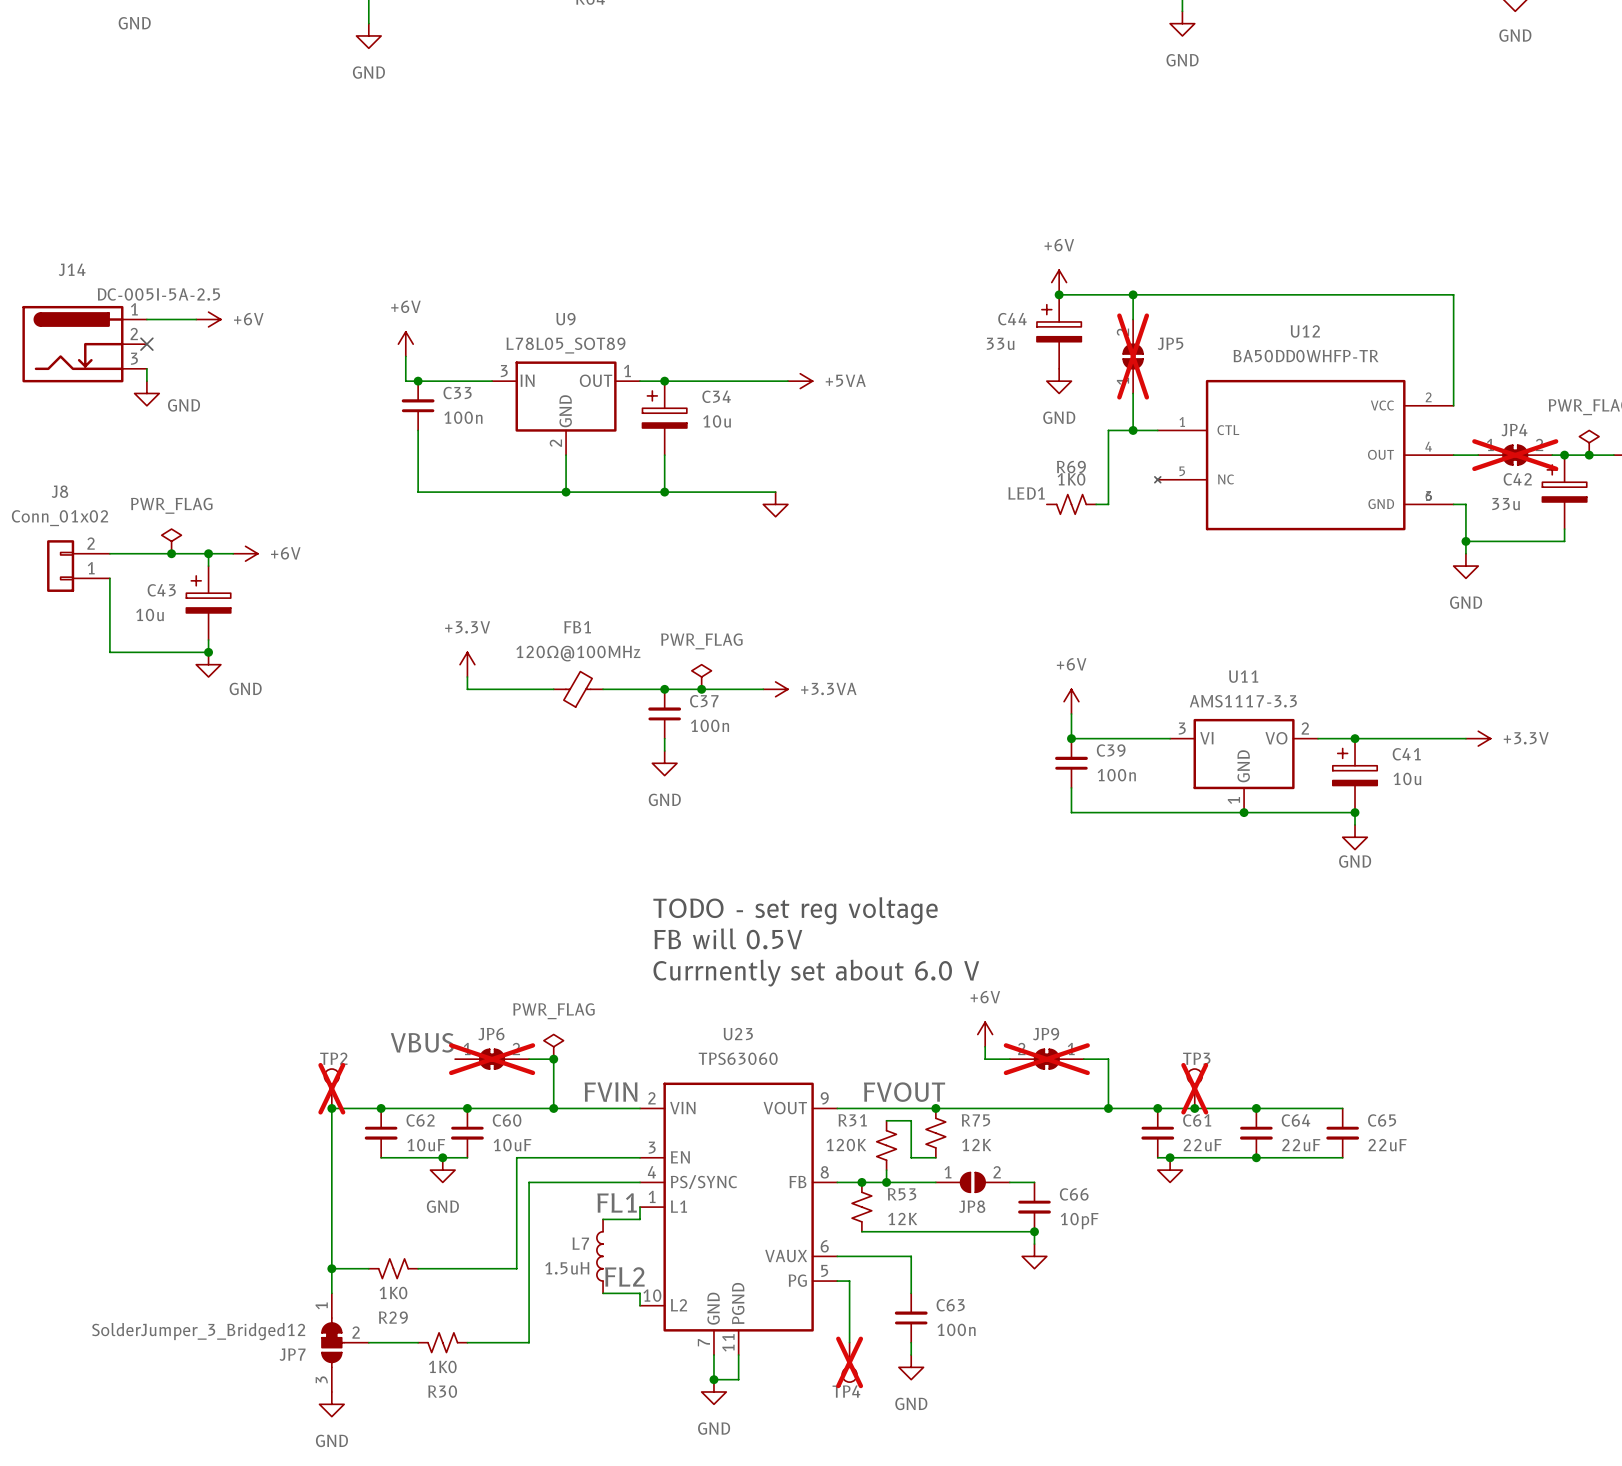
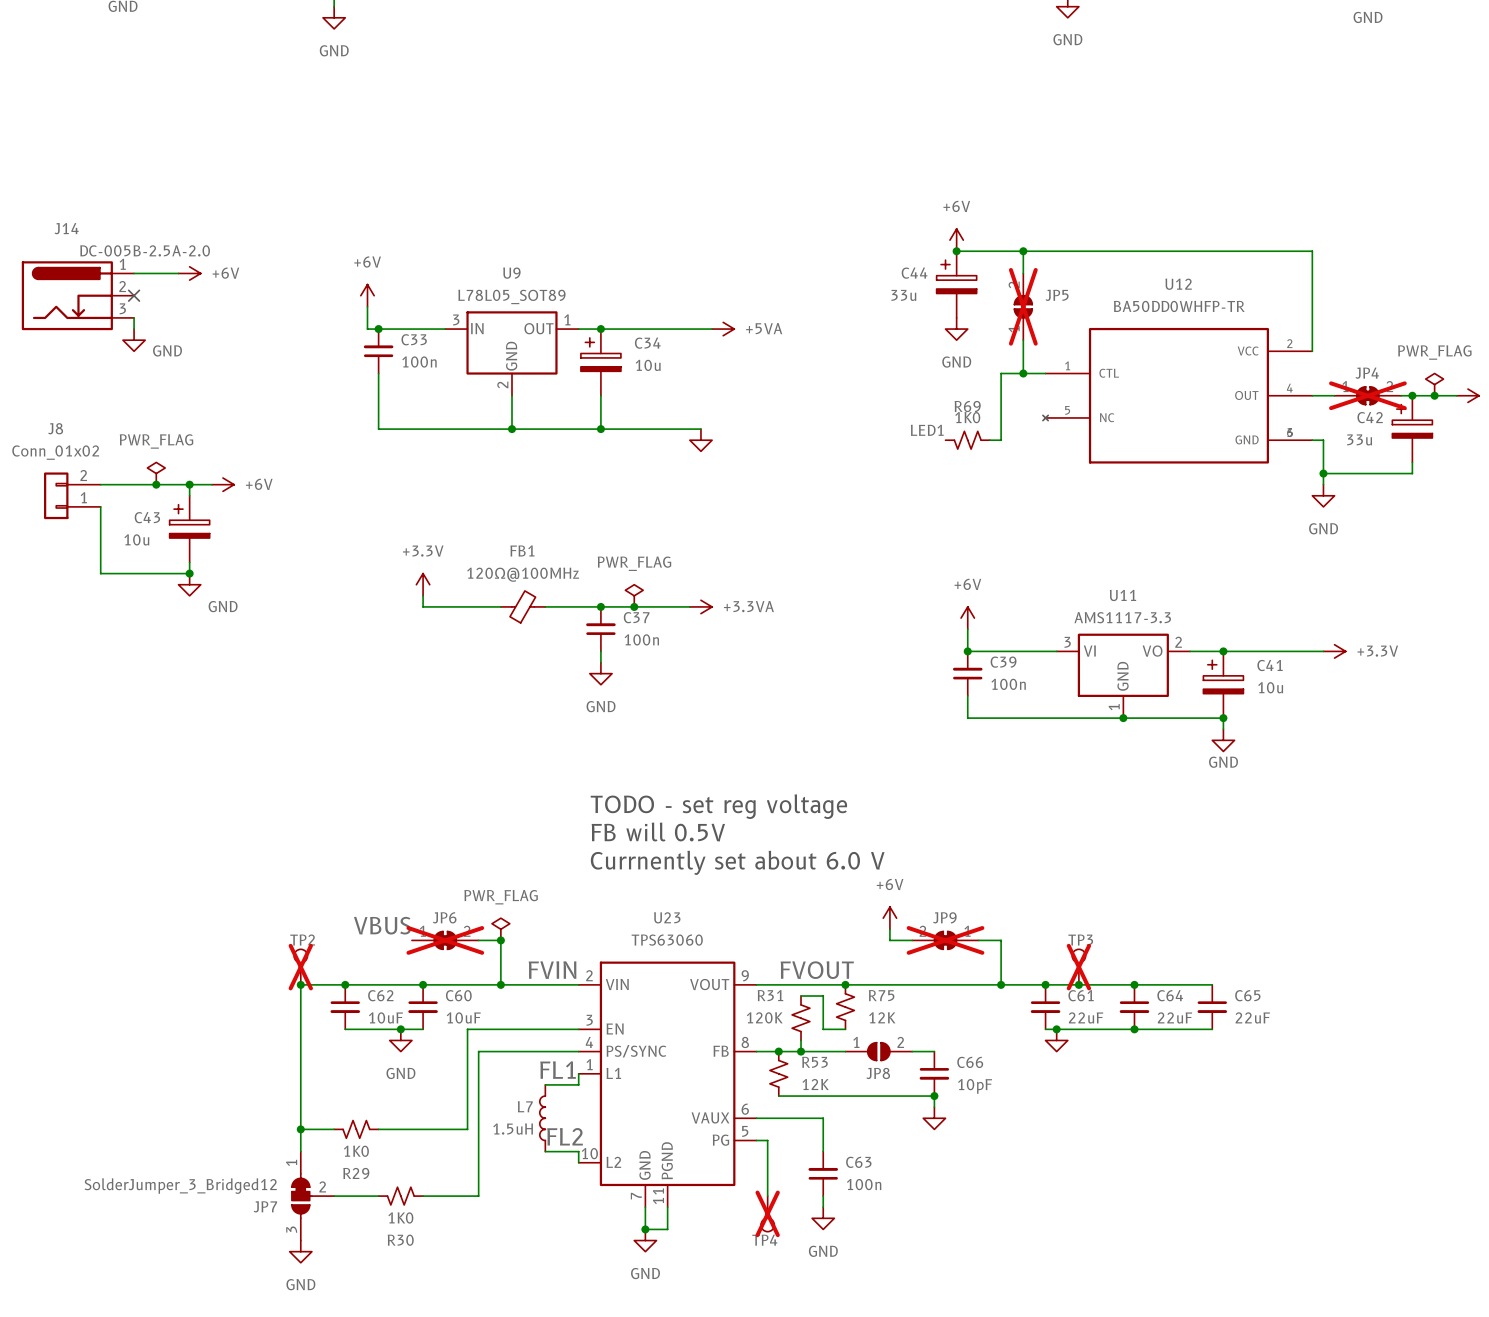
J14 value: DC-005I-5A-2.5 (158, 294) -> DC-005B-2.5A-2.0 (145, 250)

